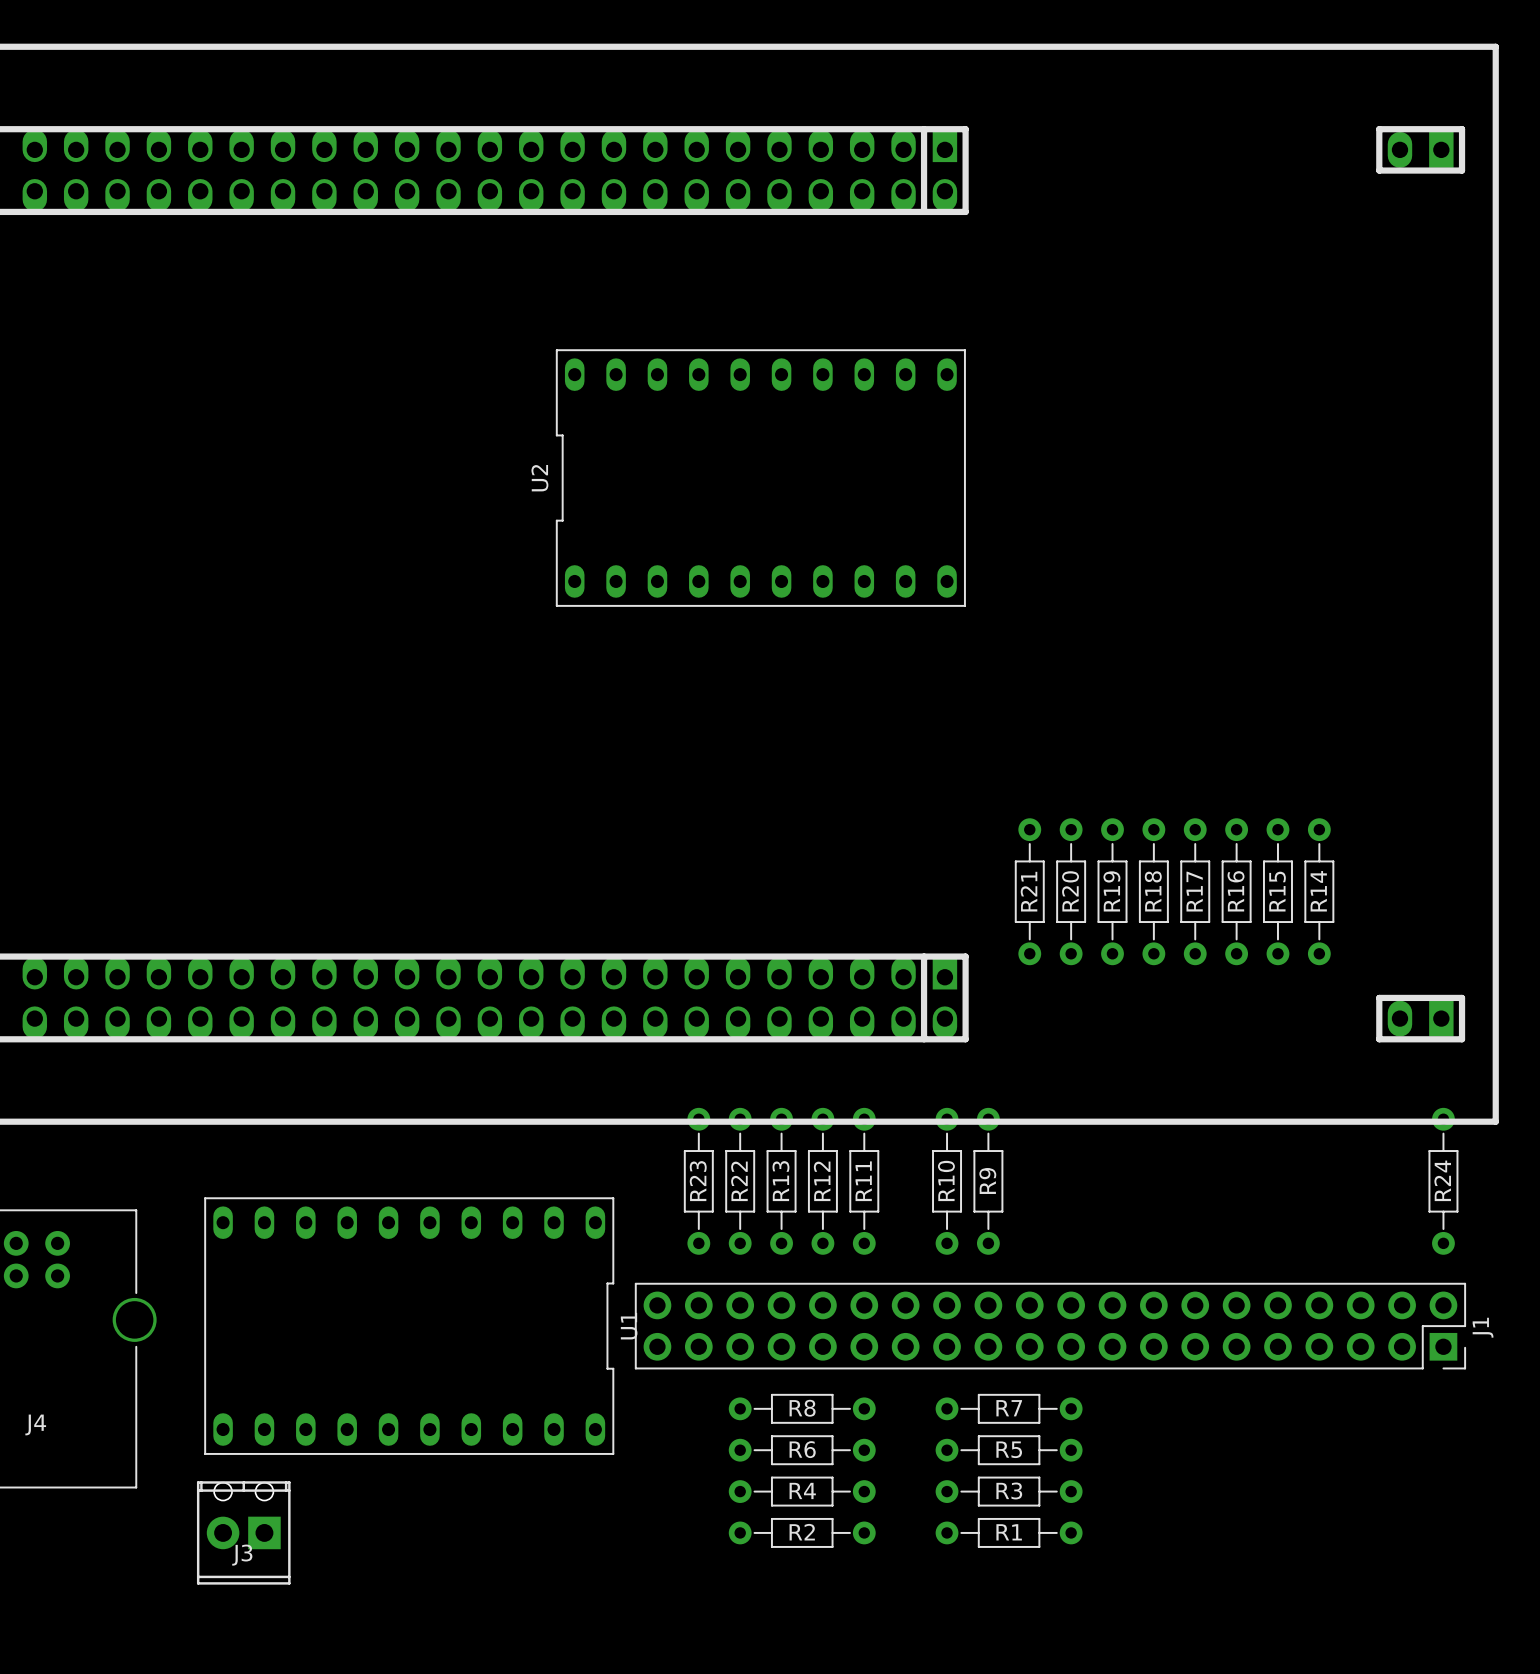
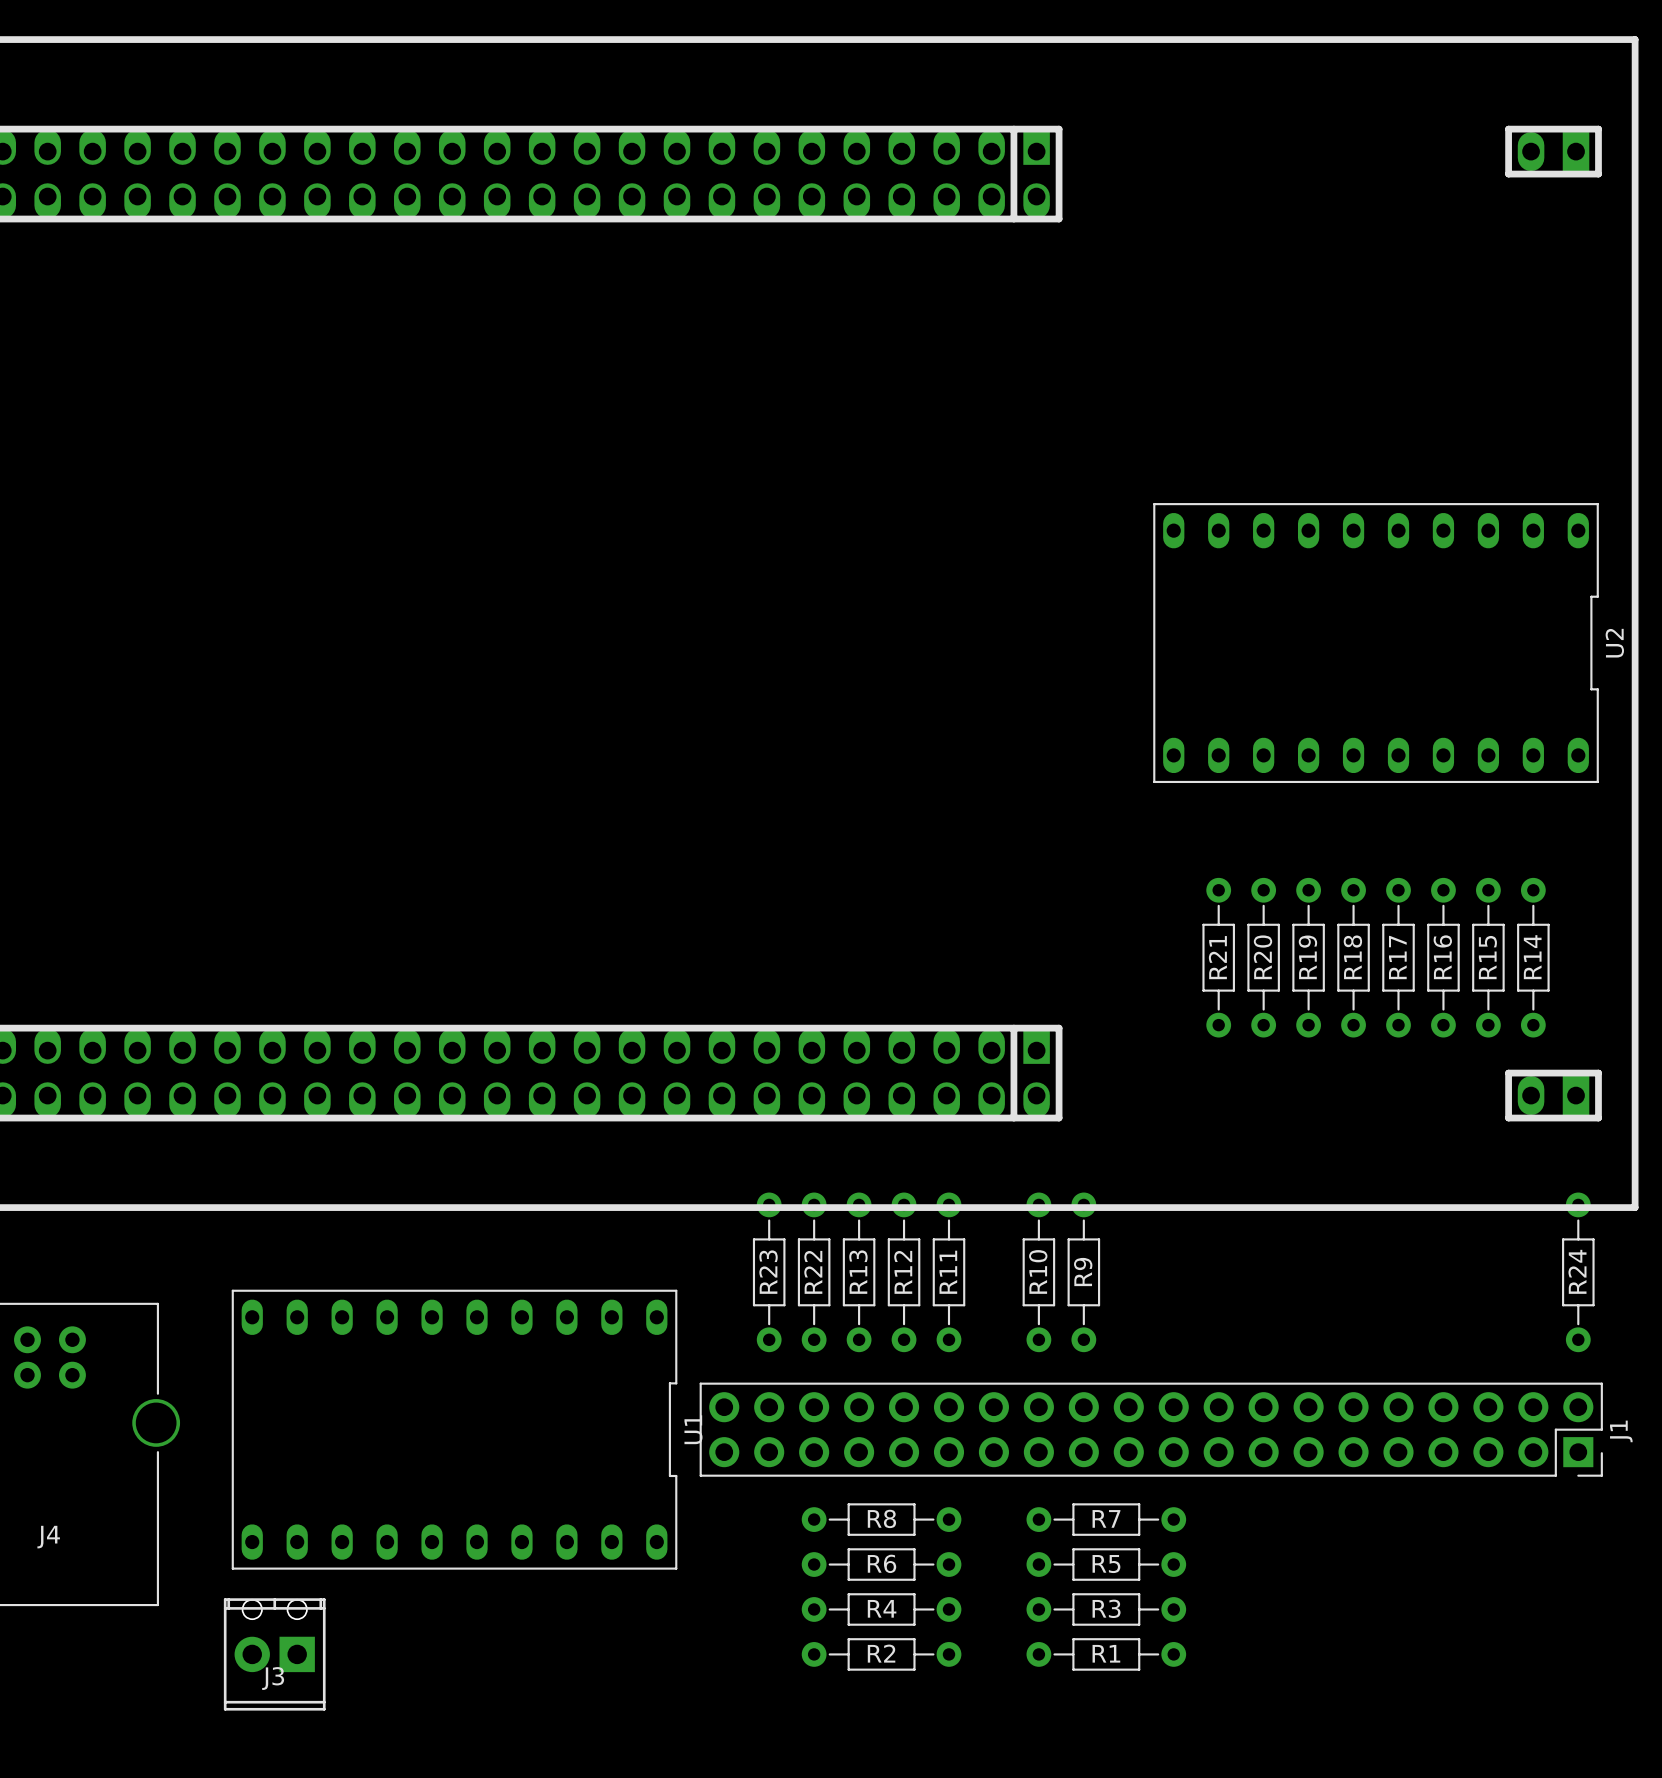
U2 rotation: 0° (760, 478) -> 180° (1376, 643)
U2 position: (760, 478) -> (1376, 643)
R21: (1029, 891) -> none
R20: (1071, 891) -> none
R19 name: R19 (1111, 891) -> R21 (1217, 957)
R18 name: R18 (1153, 891) -> R20 (1263, 957)
R17 name: R17 (1194, 891) -> R19 (1307, 957)
R16 name: R16 (1236, 891) -> R18 (1352, 957)
R15 name: R15 (1277, 891) -> R17 (1397, 957)
R14 name: R14 (1318, 891) -> R16 (1442, 957)
R15: none -> (1488, 957)
R14: none -> (1533, 957)

